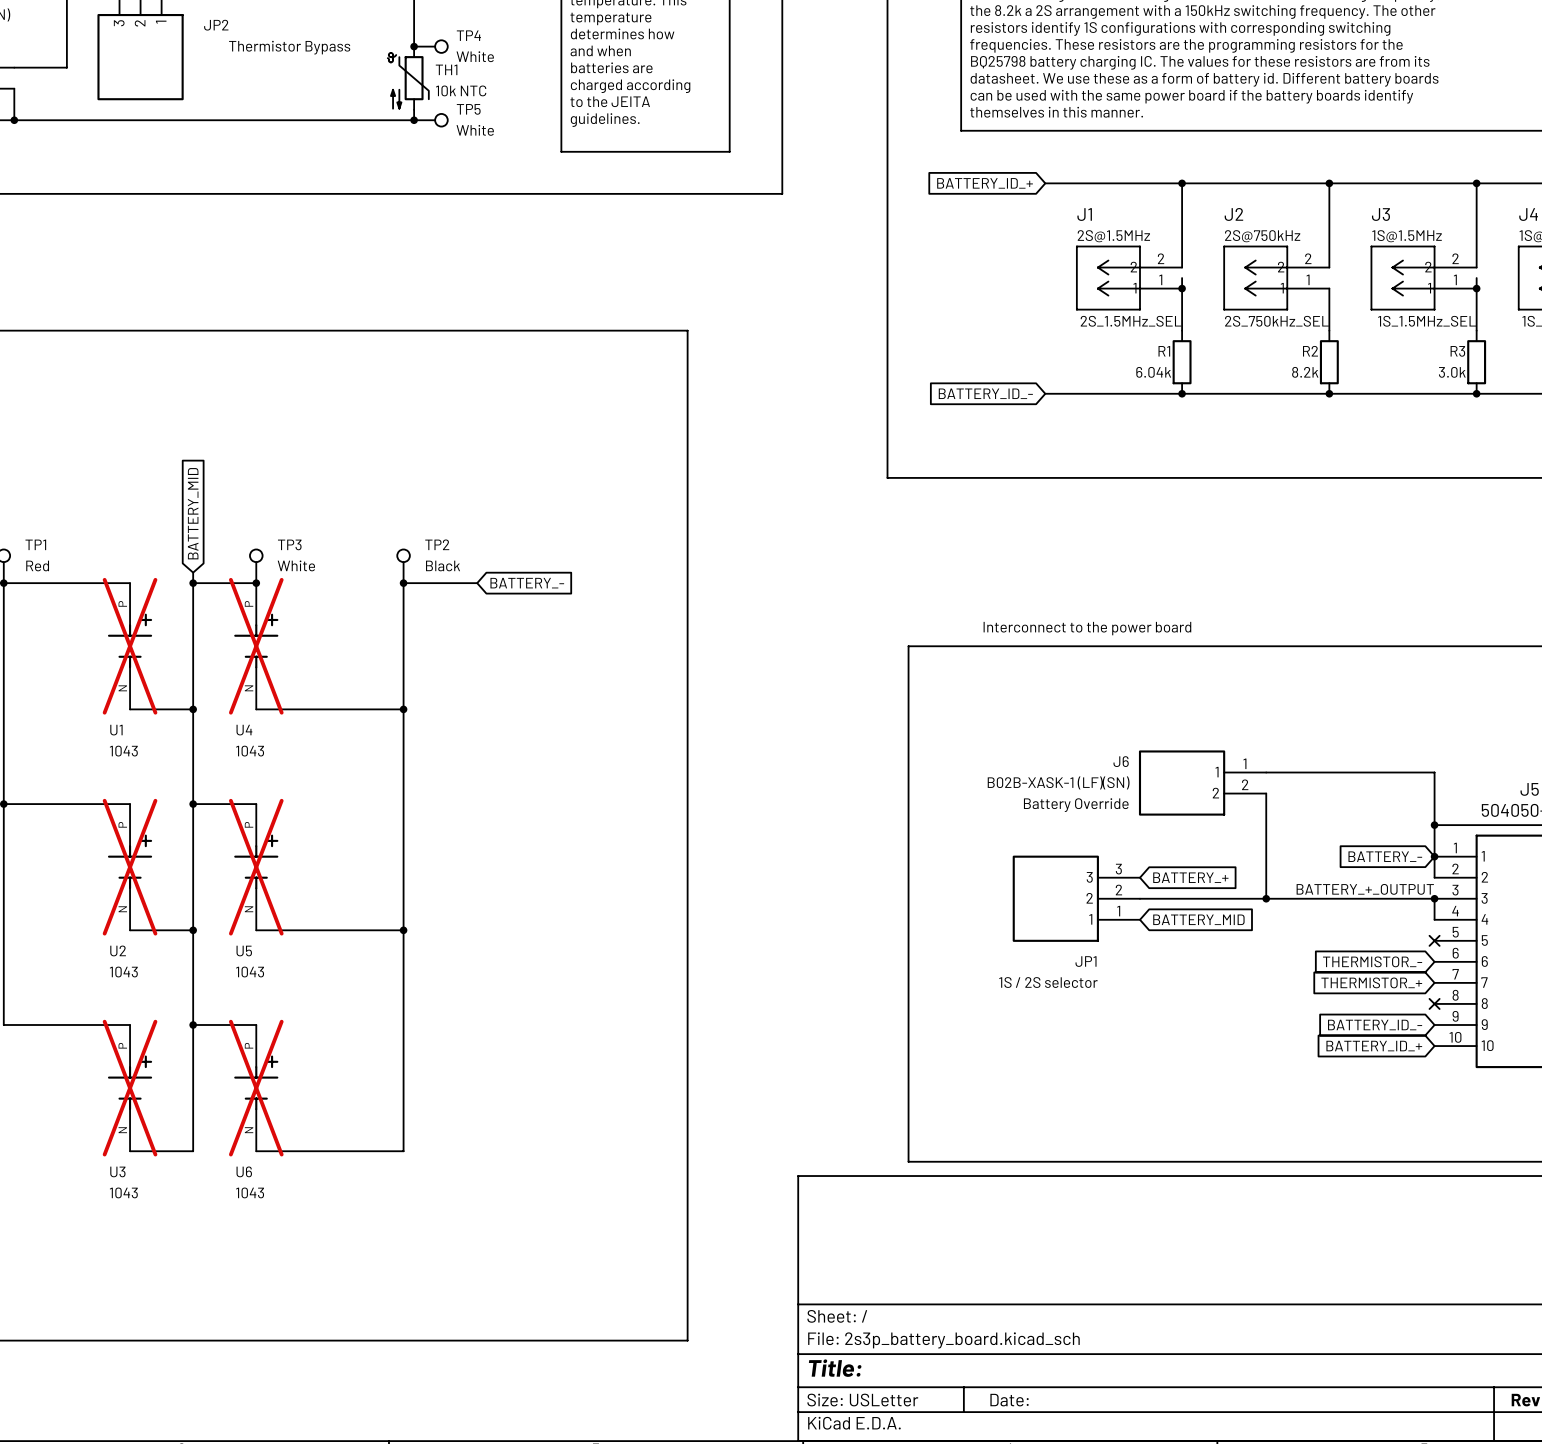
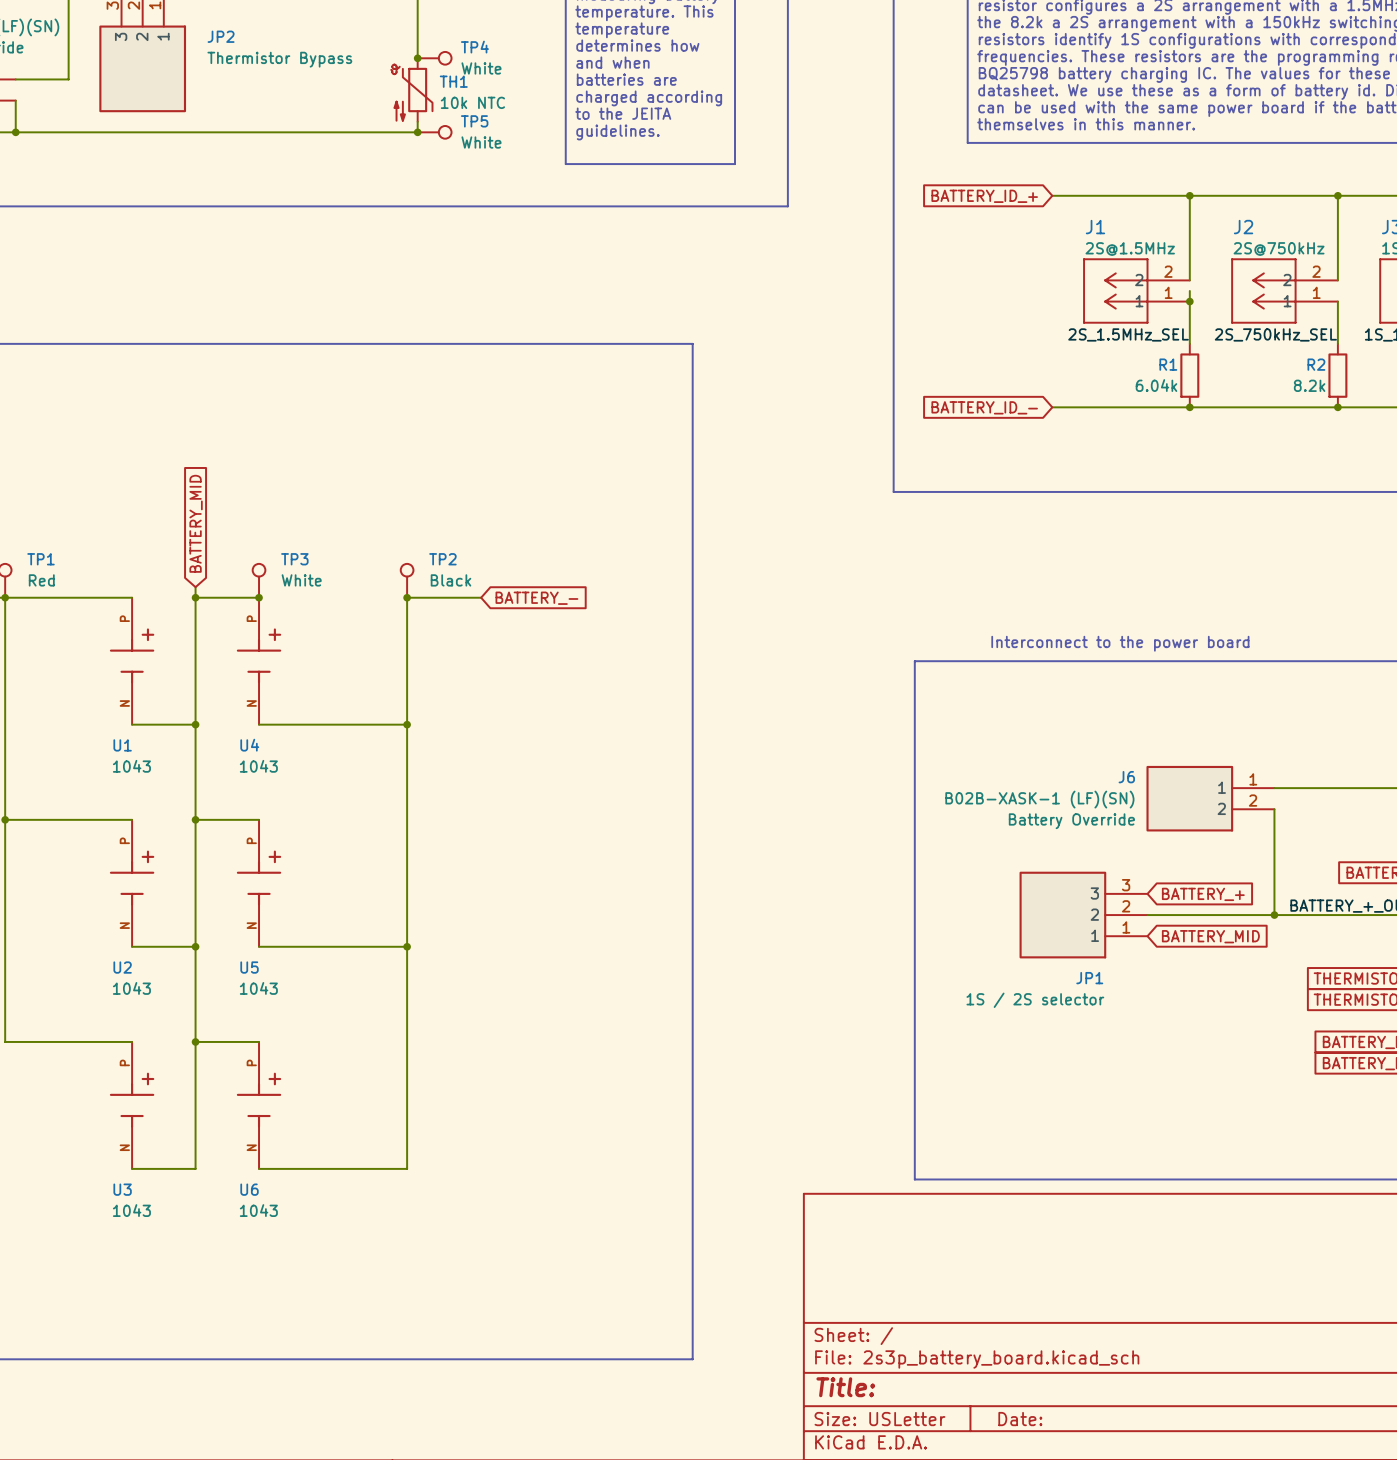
U1 do-not-place cross: (130, 646) -> none
U4 do-not-place cross: (256, 646) -> none
U2 do-not-place cross: (130, 867) -> none
U5 do-not-place cross: (256, 867) -> none
U3 do-not-place cross: (130, 1088) -> none
U6 do-not-place cross: (256, 1088) -> none

